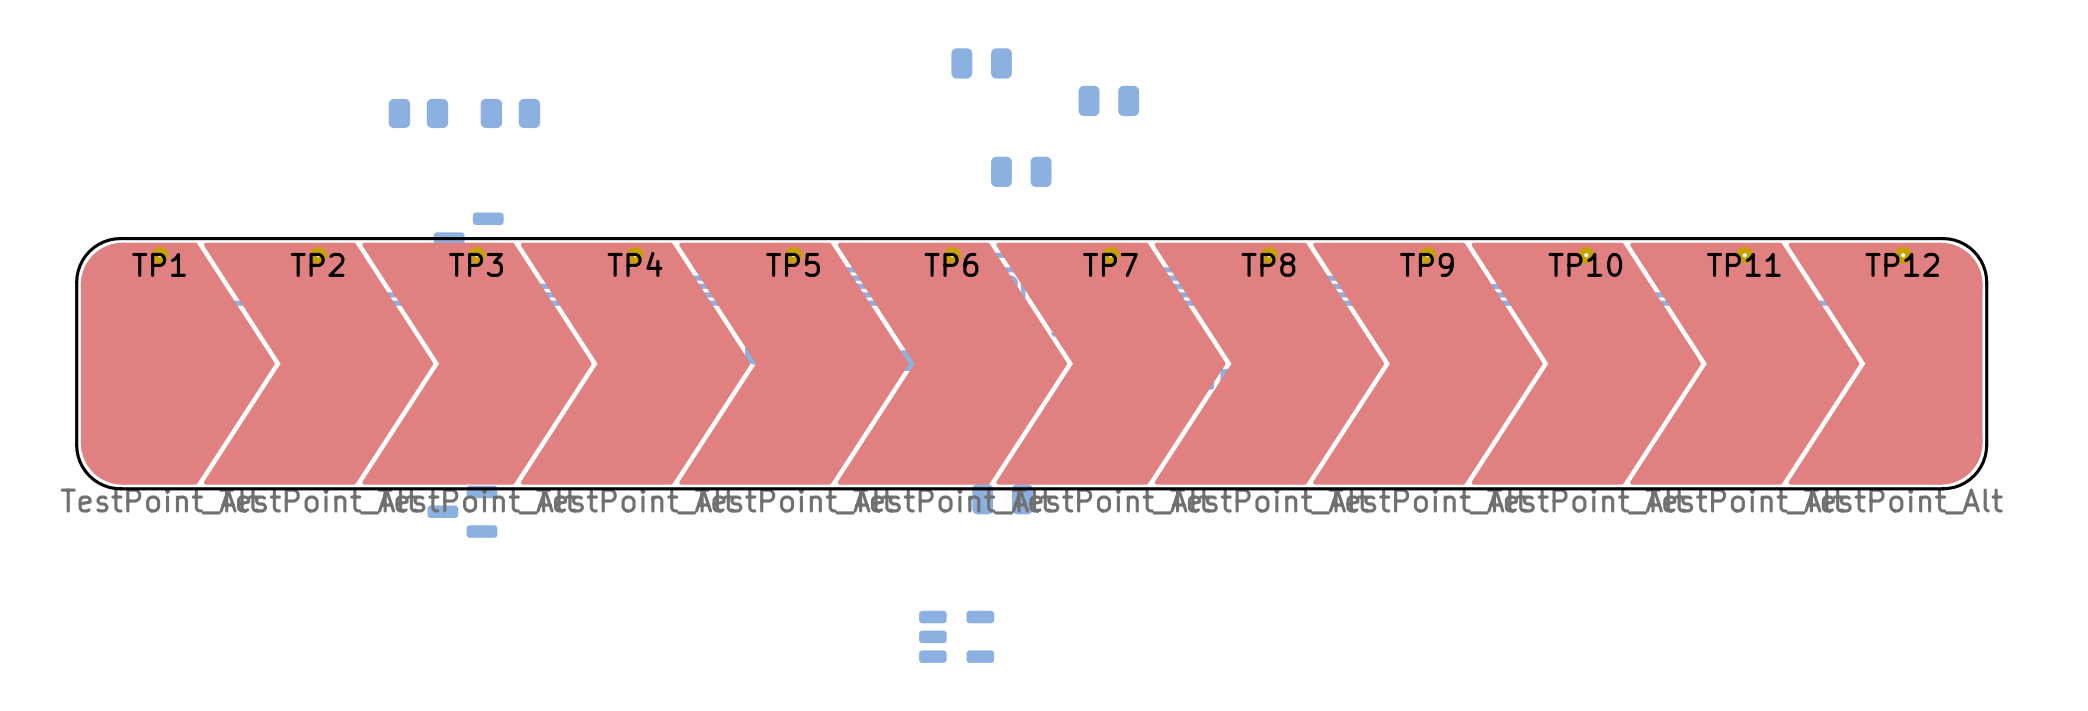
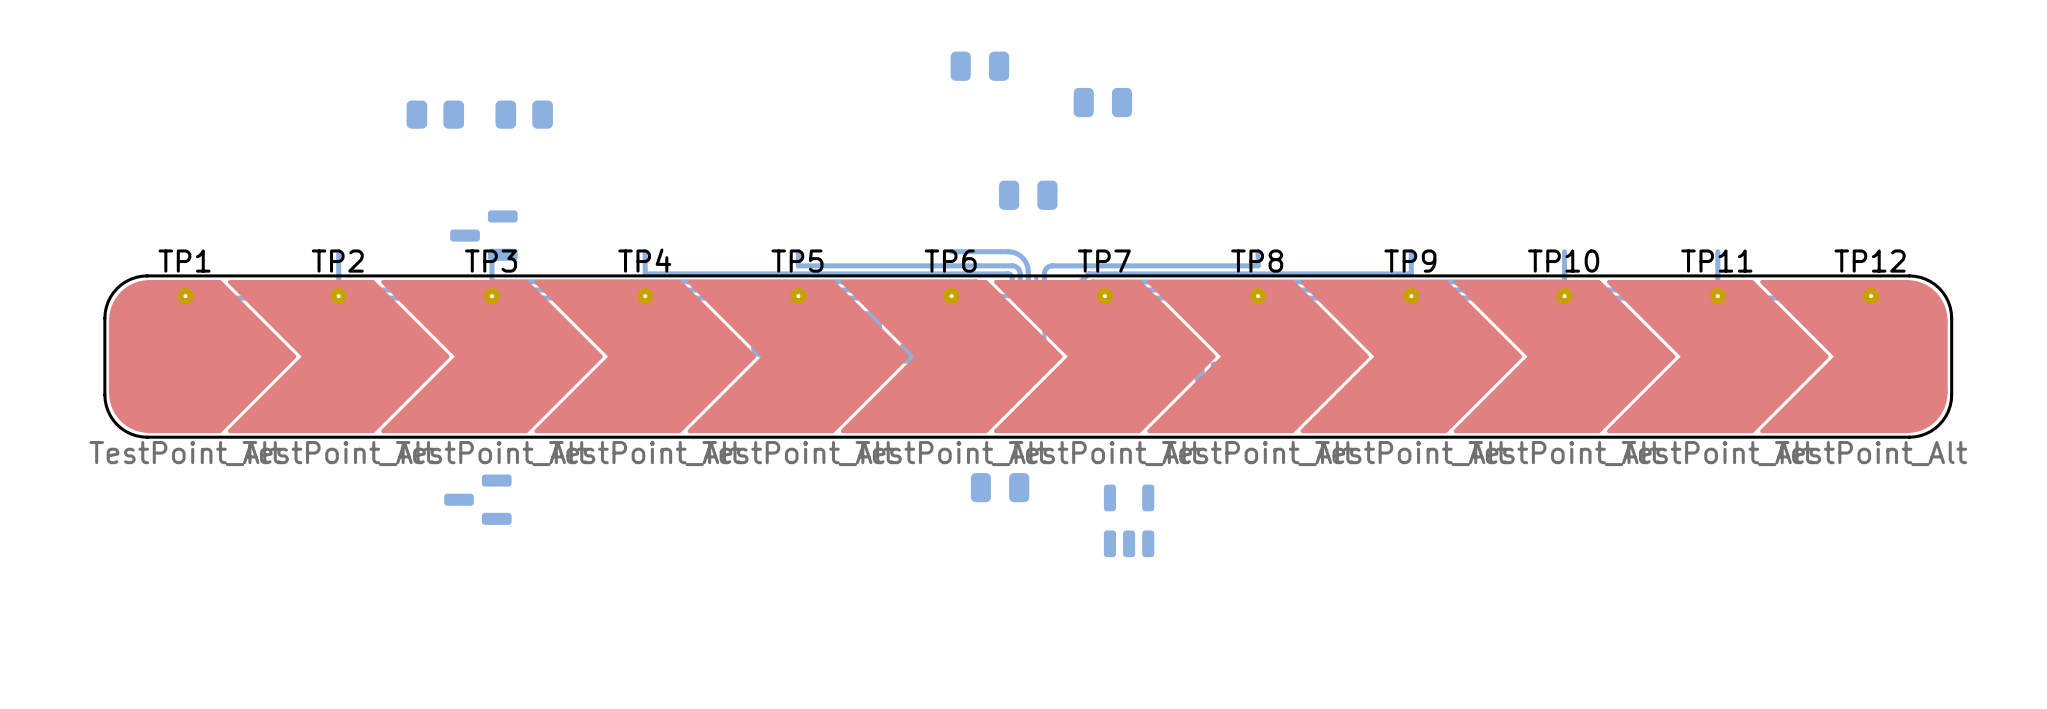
part position: (1021, 171) -> (1028, 195)
TP1 footprint: [80, 242, 275, 485] -> [108, 279, 297, 434]
TP2 footprint: [203, 242, 434, 485] -> [227, 279, 450, 434]
TP3 footprint: [362, 242, 592, 485] -> [381, 279, 603, 434]
TP4 footprint: [520, 242, 751, 485] -> [534, 279, 757, 434]
TP5 footprint: [679, 242, 909, 485] -> [687, 279, 910, 434]
TP6 footprint: [837, 242, 1068, 485] -> [840, 279, 1063, 434]
TP7 footprint: [996, 242, 1226, 485] -> [993, 279, 1216, 434]
TP8 footprint: [1154, 242, 1385, 485] -> [1147, 279, 1370, 434]
TP9 footprint: [1313, 242, 1543, 485] -> [1300, 279, 1523, 434]
TP10 footprint: [1471, 242, 1702, 485] -> [1453, 279, 1676, 434]
TP11 footprint: [1630, 242, 1860, 485] -> [1606, 279, 1829, 434]
TP12 footprint: [1788, 242, 1983, 485] -> [1760, 279, 1948, 434]
board edge: (76, 324) (77, 276) (82, 260) (98, 244) (120, 238) (1942, 238) (1964, 244) (1980, 260) (1986, 276) (1986, 324) -> (104, 318) (108, 302) (117, 288) (130, 279) (147, 275) (1909, 275) (1925, 279) (1939, 288) (1948, 302) (1951, 318)
board edge: (76, 403) (77, 450) (82, 466) (98, 482) (120, 488) (1942, 488) (1964, 482) (1980, 466) (1986, 450) (1986, 403) -> (104, 394) (108, 411) (117, 424) (130, 433) (147, 437) (1909, 437) (1925, 433) (1939, 424) (1948, 411) (1951, 394)
part rotation: 0° (956, 636) -> 90° counterclockwise (1129, 520)
part position: (956, 636) -> (1129, 520)

